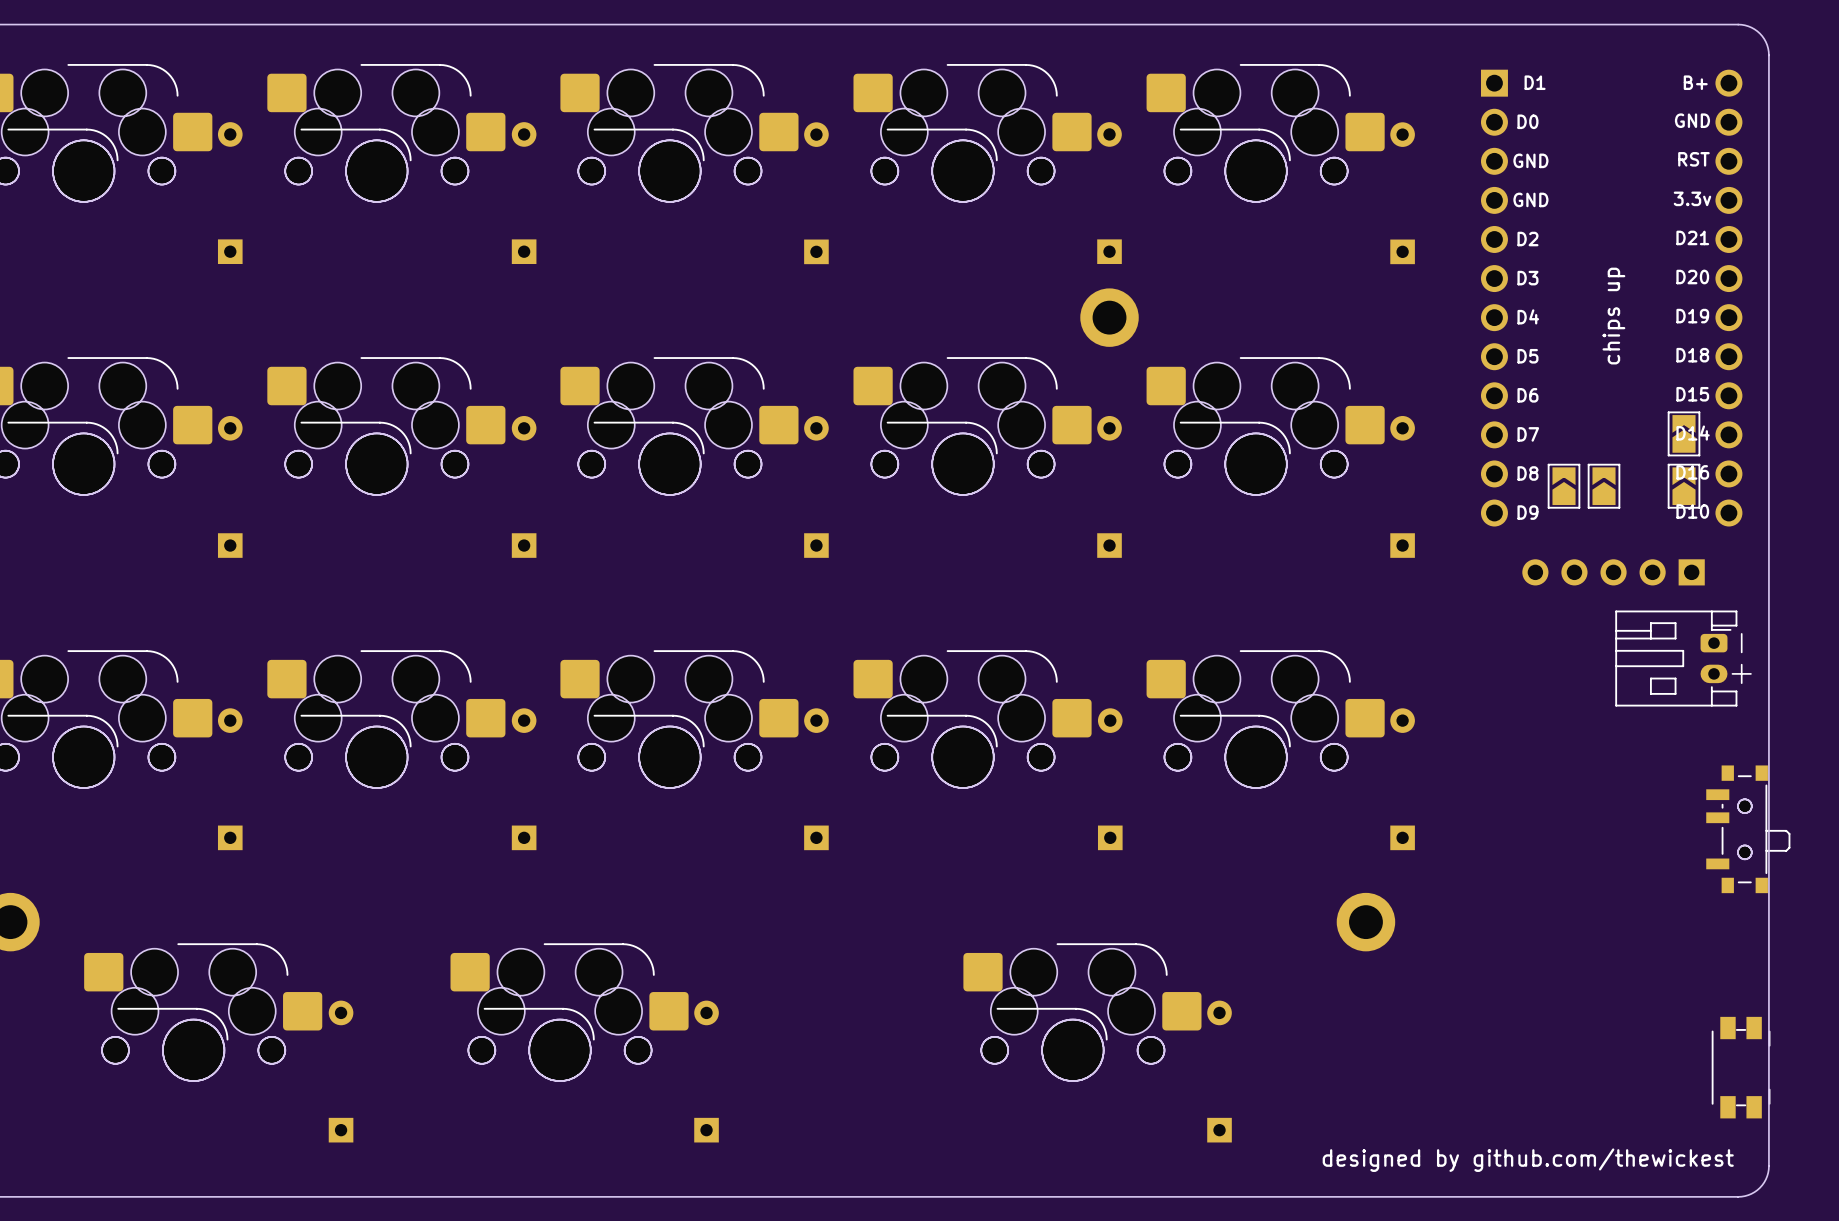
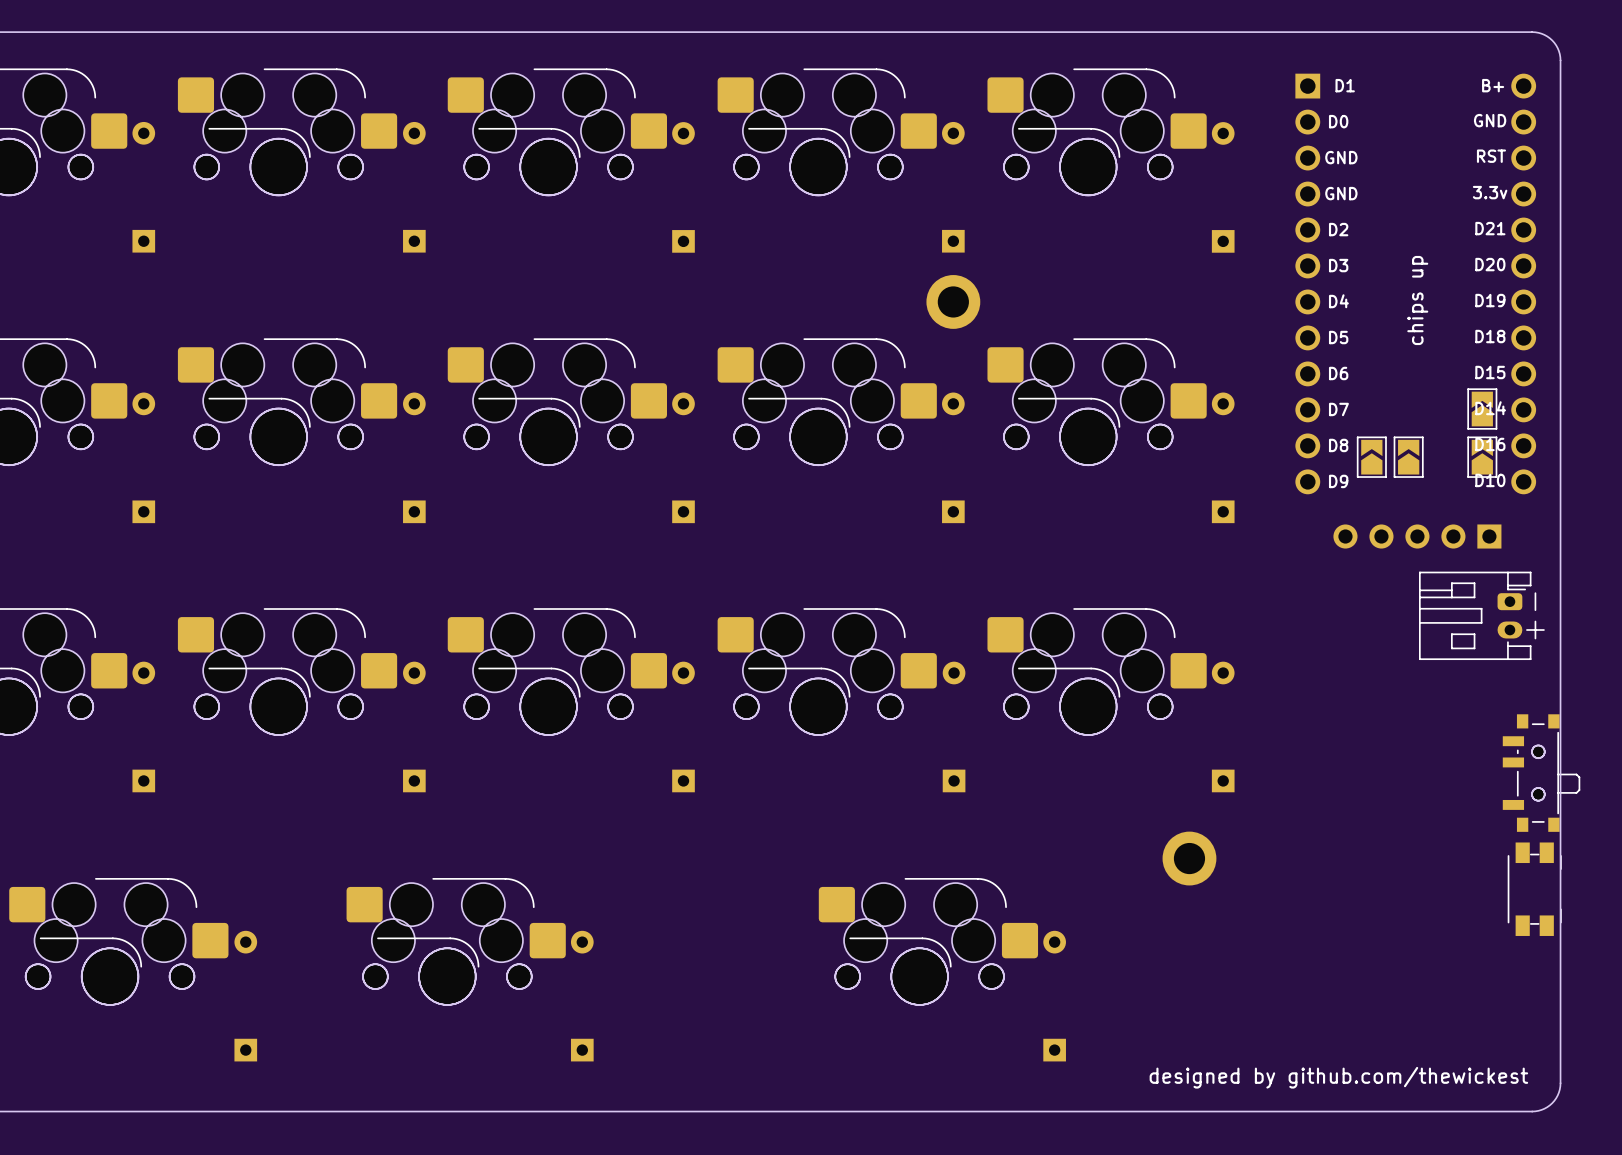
part position: (1741, 1067) -> (1534, 889)

